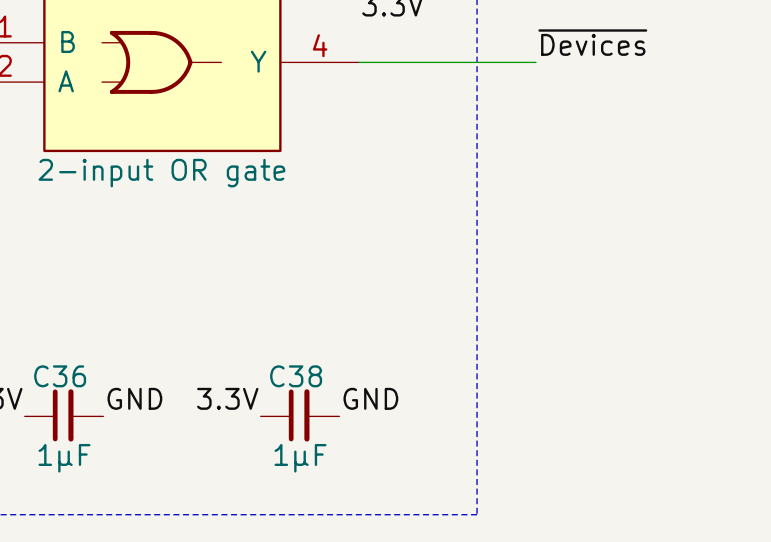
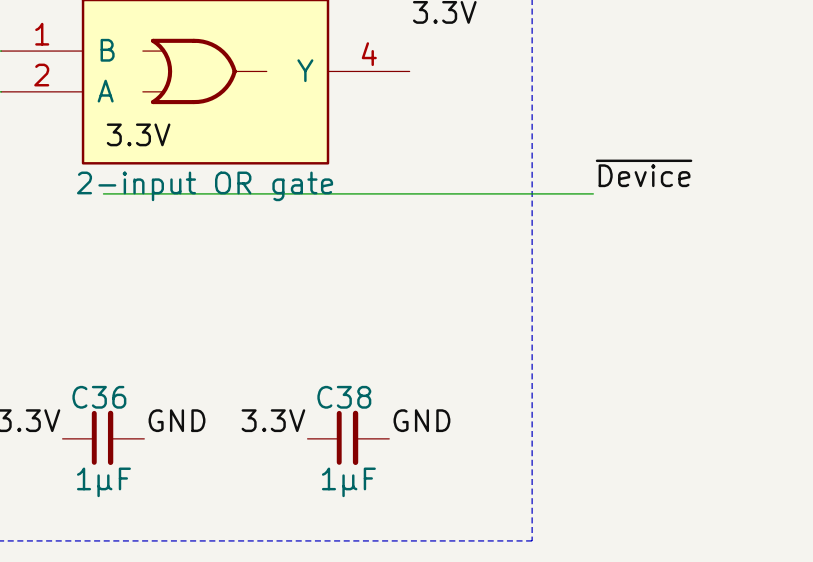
label: ~{Devices} (592, 42) -> none
wire: (359, 62) (536, 62) -> none
label: none -> 3.3V (138, 134)
label: none -> ~{Device} (644, 173)
wire: none -> (103, 193) (593, 193)

